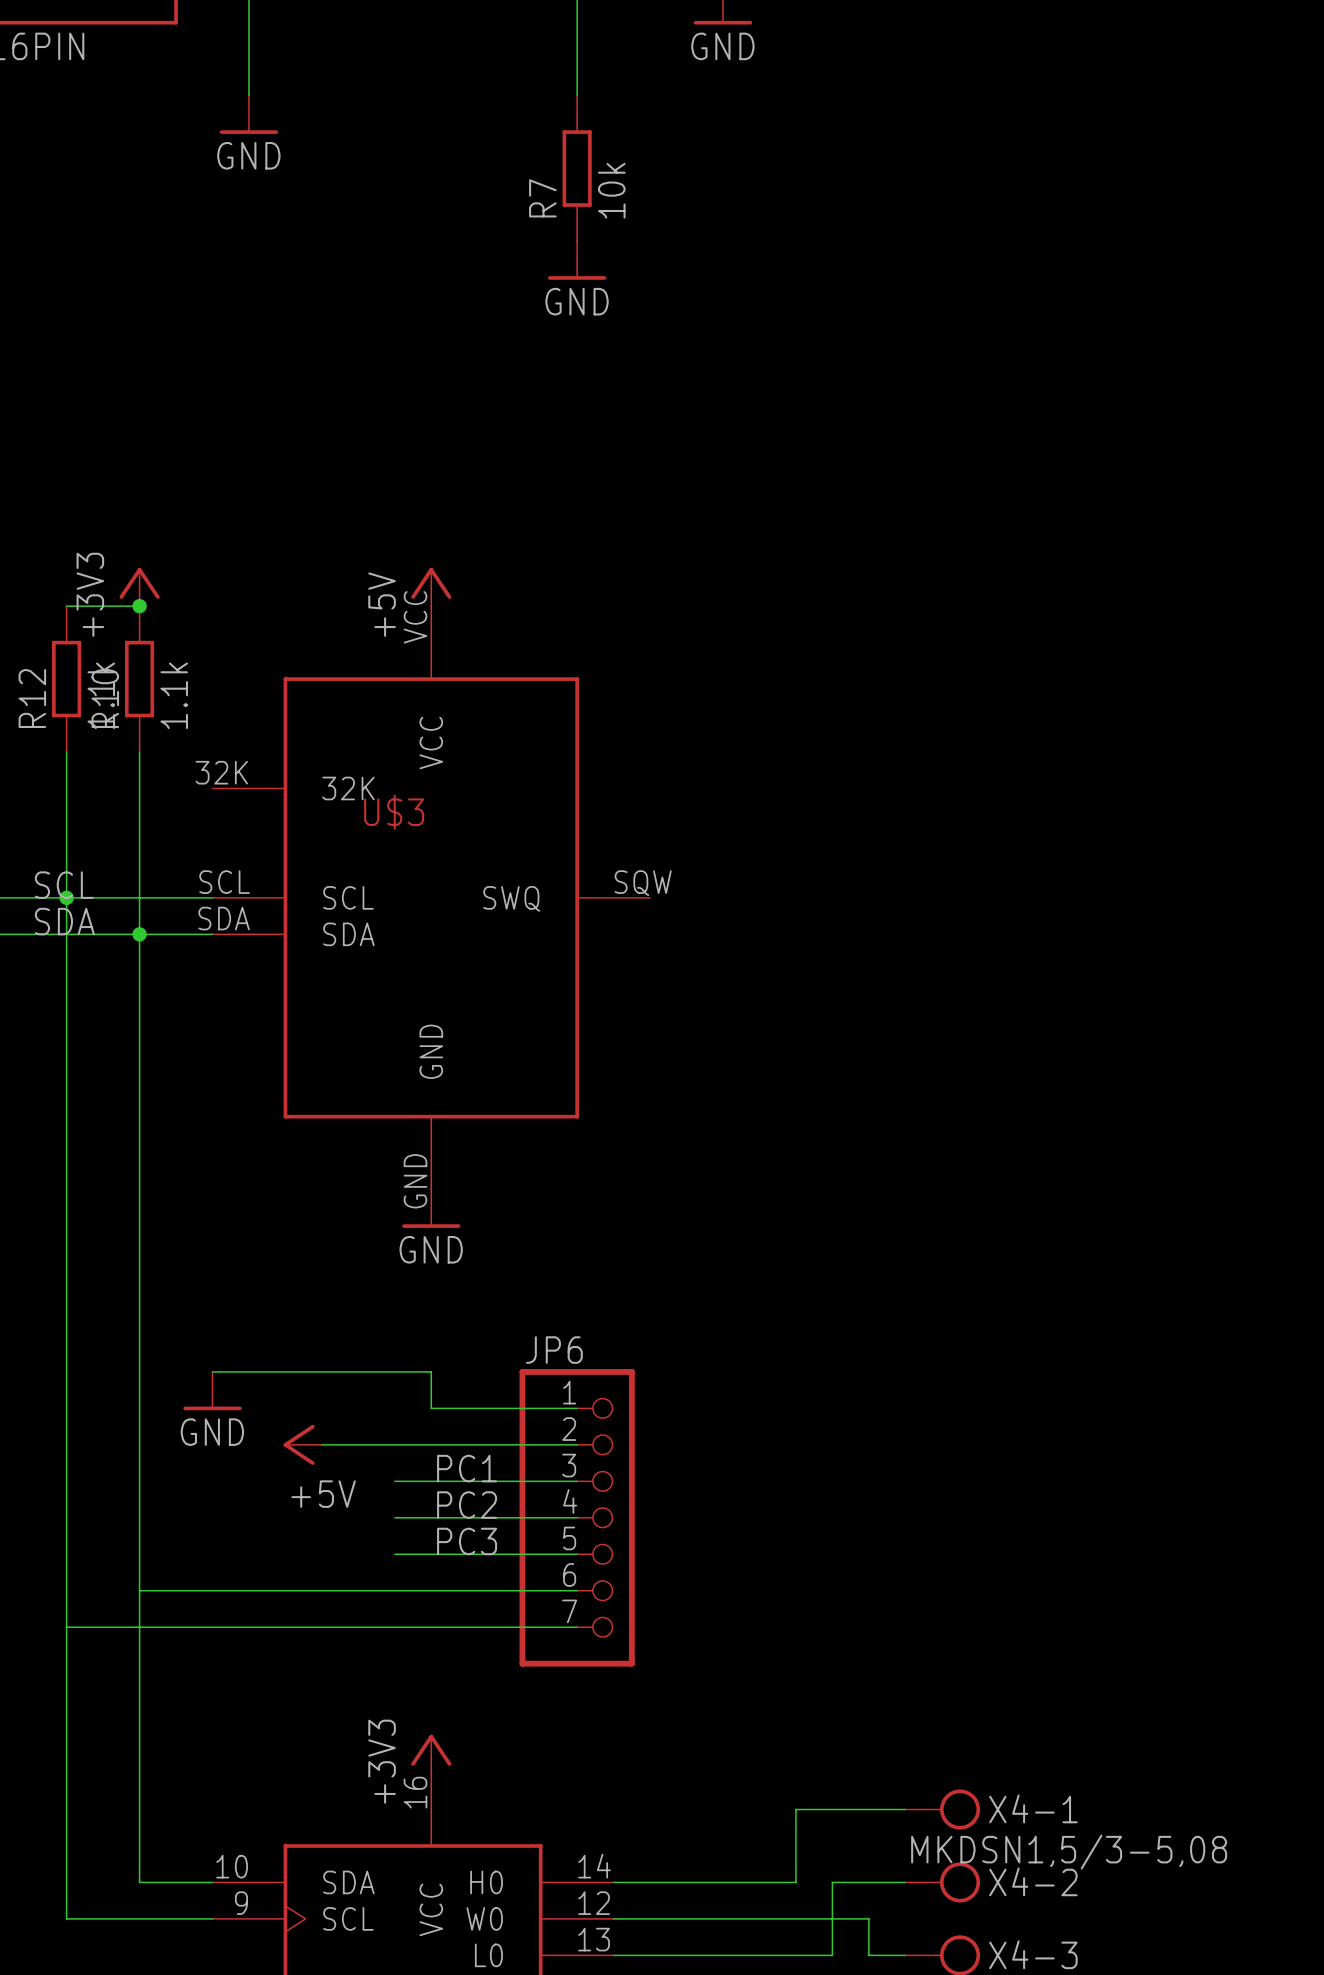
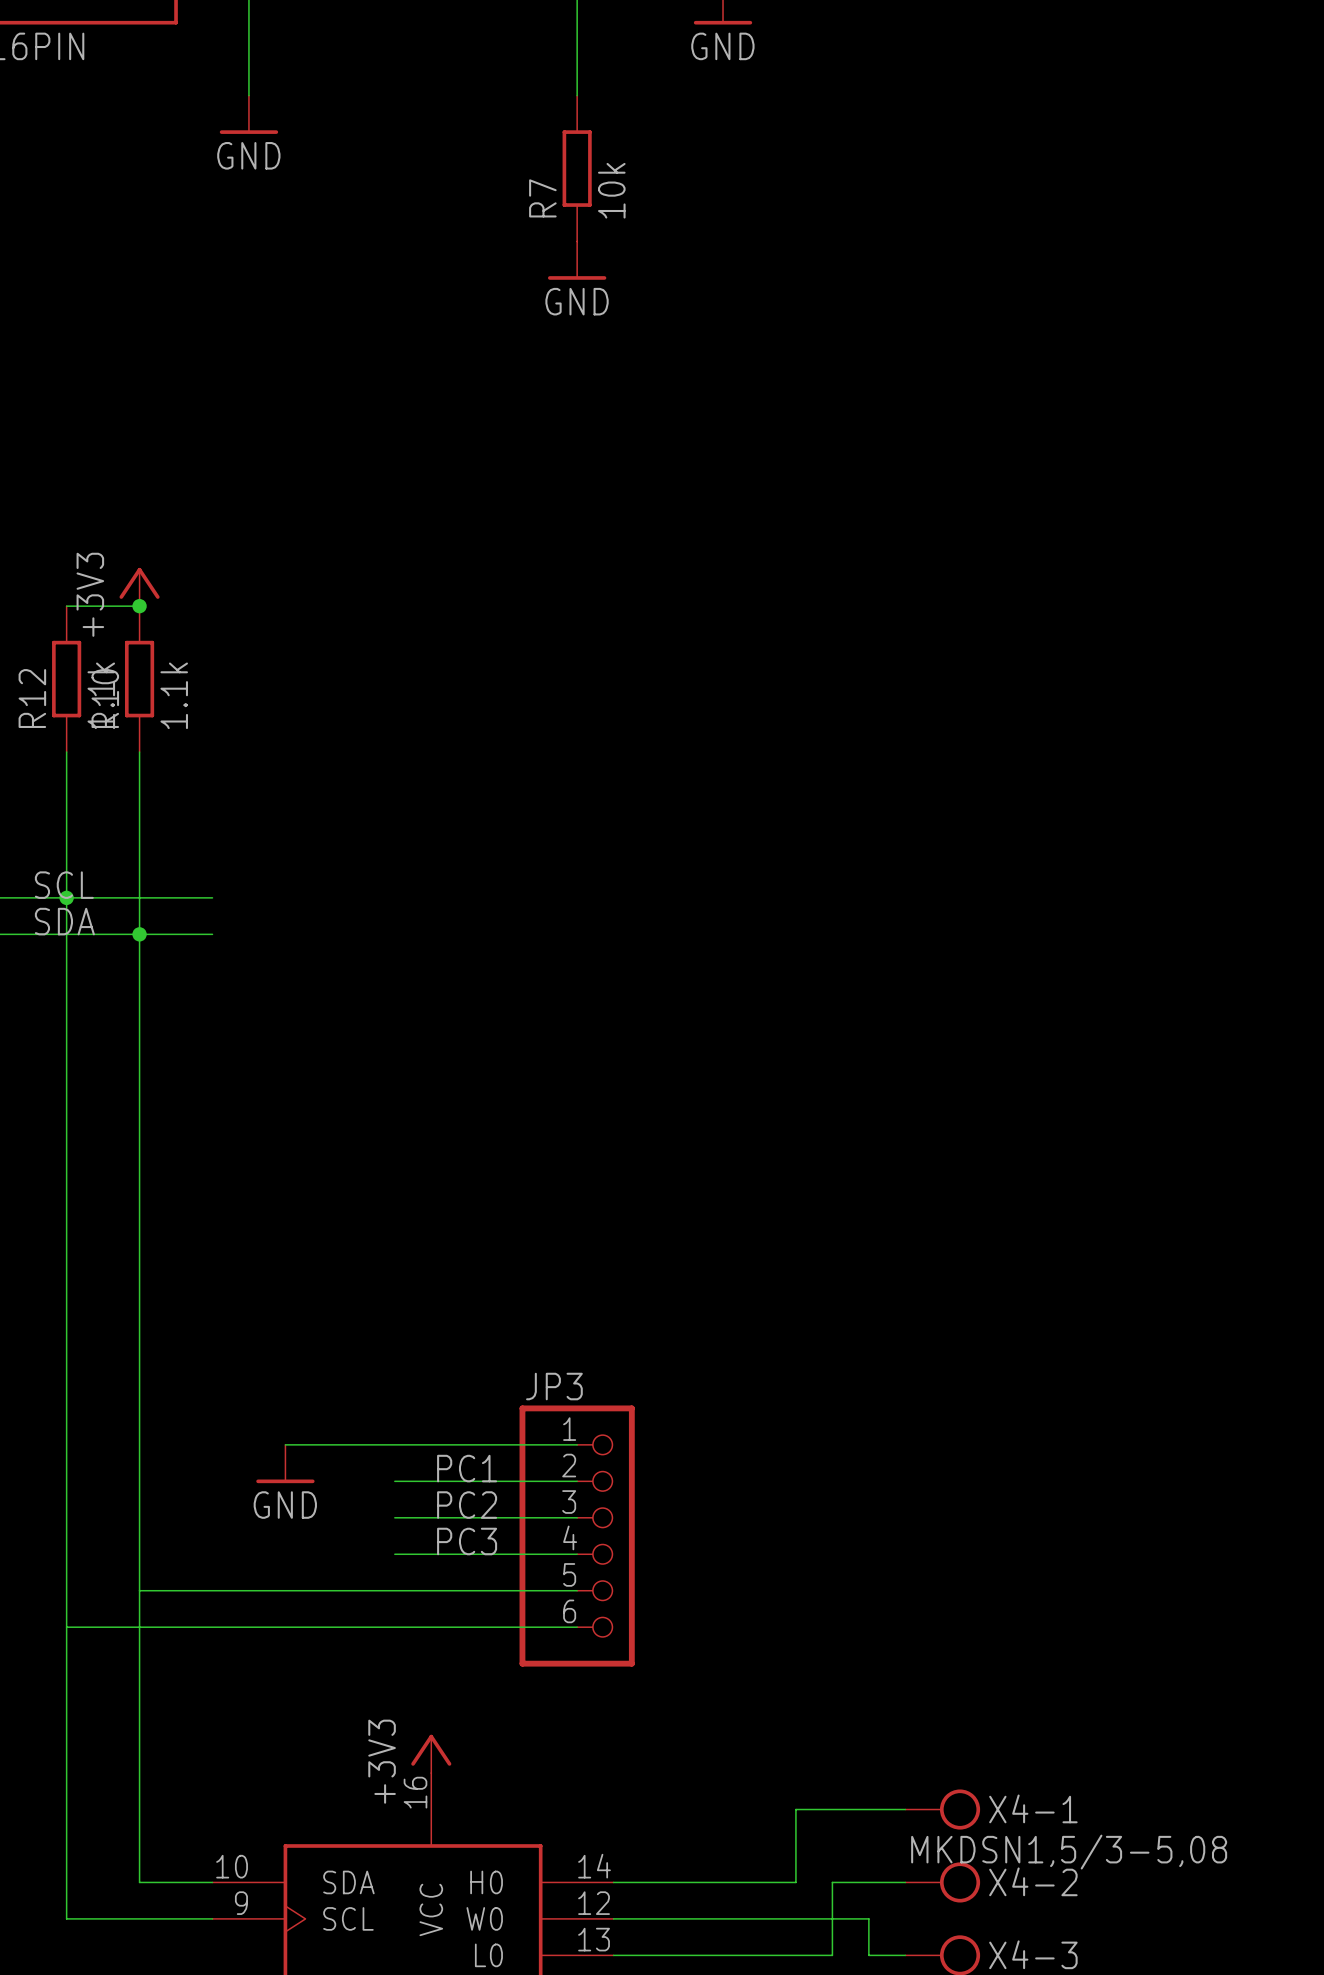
power symbol: +5V (431, 587) -> none
U$3: (431, 897) -> none
power symbol: GND (431, 1208) -> none
wire: (212, 1371) (431, 1371) (431, 1408) (577, 1408) -> none
power symbol position: GND (212, 1391) -> GND (285, 1464)
power symbol: +5V (302, 1444) -> none
JP6: (577, 1517) -> none
JP3: none -> (577, 1536)

